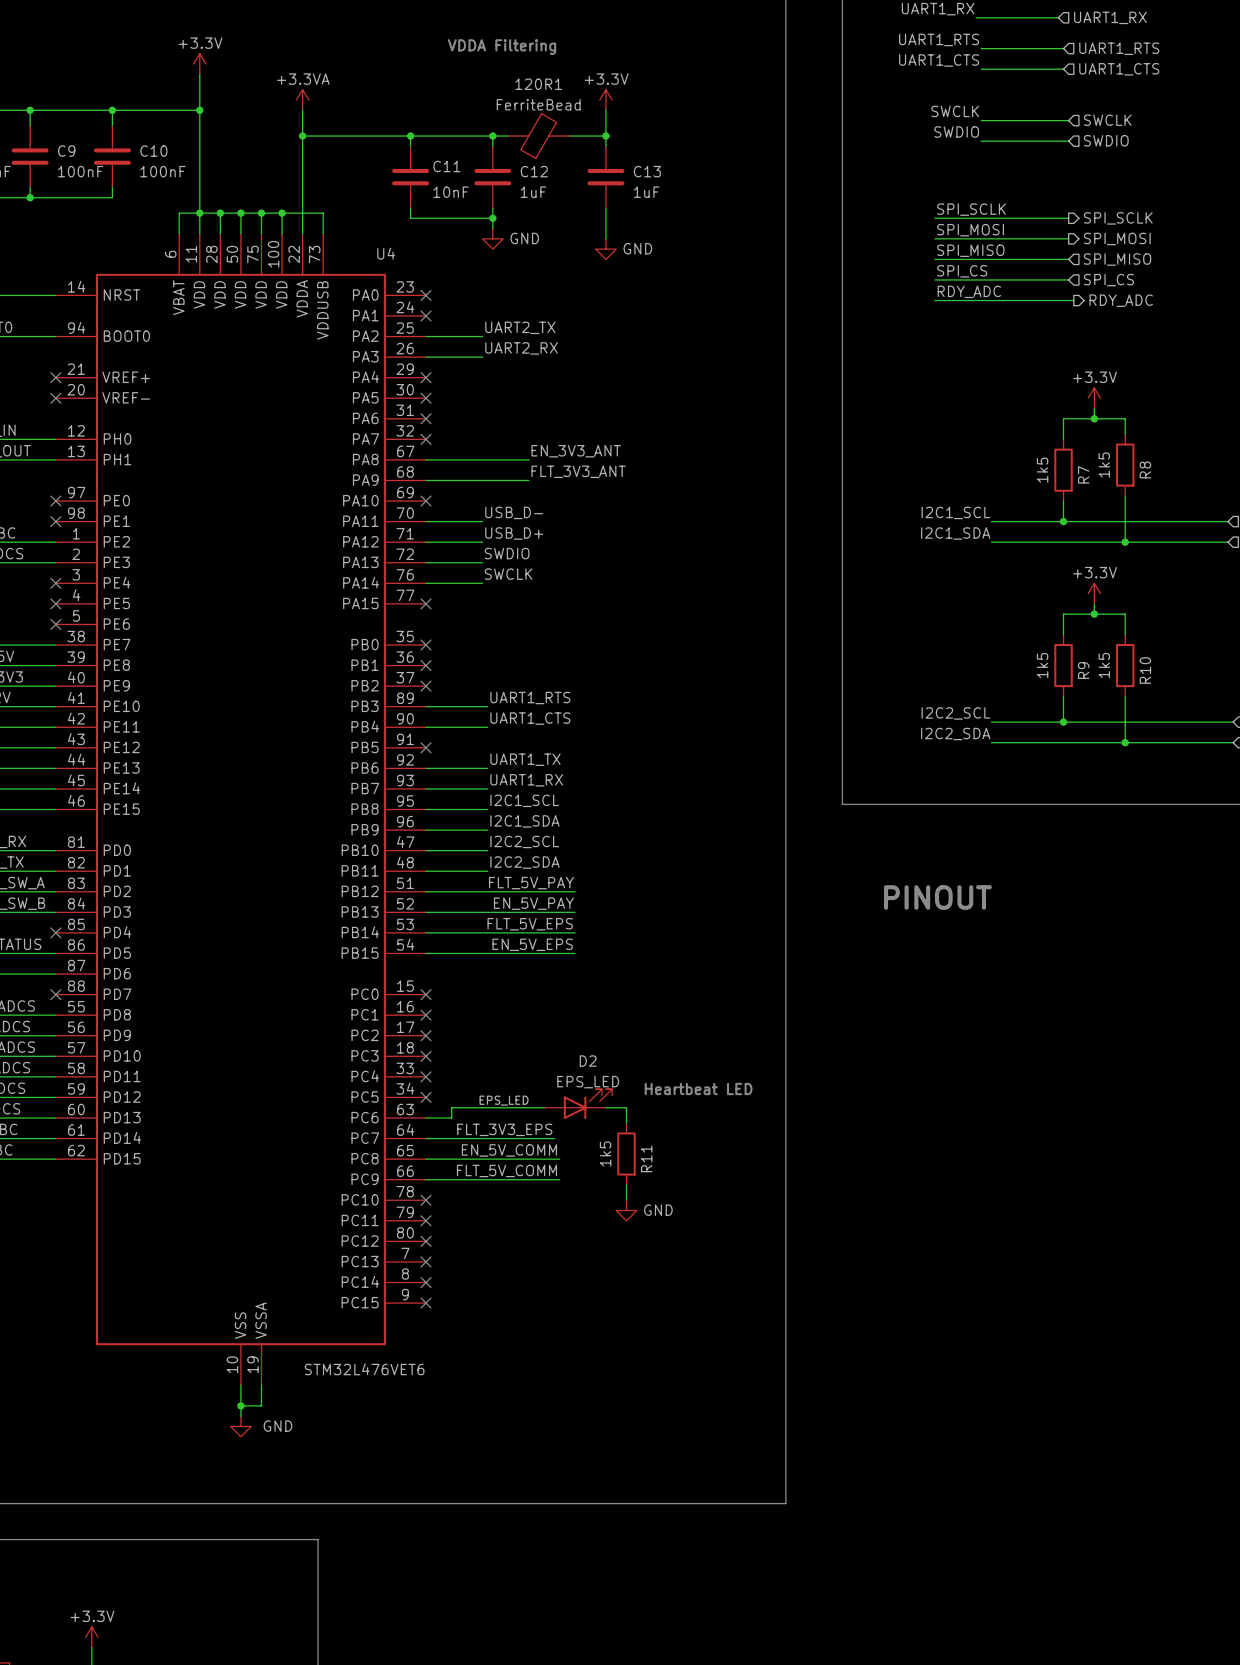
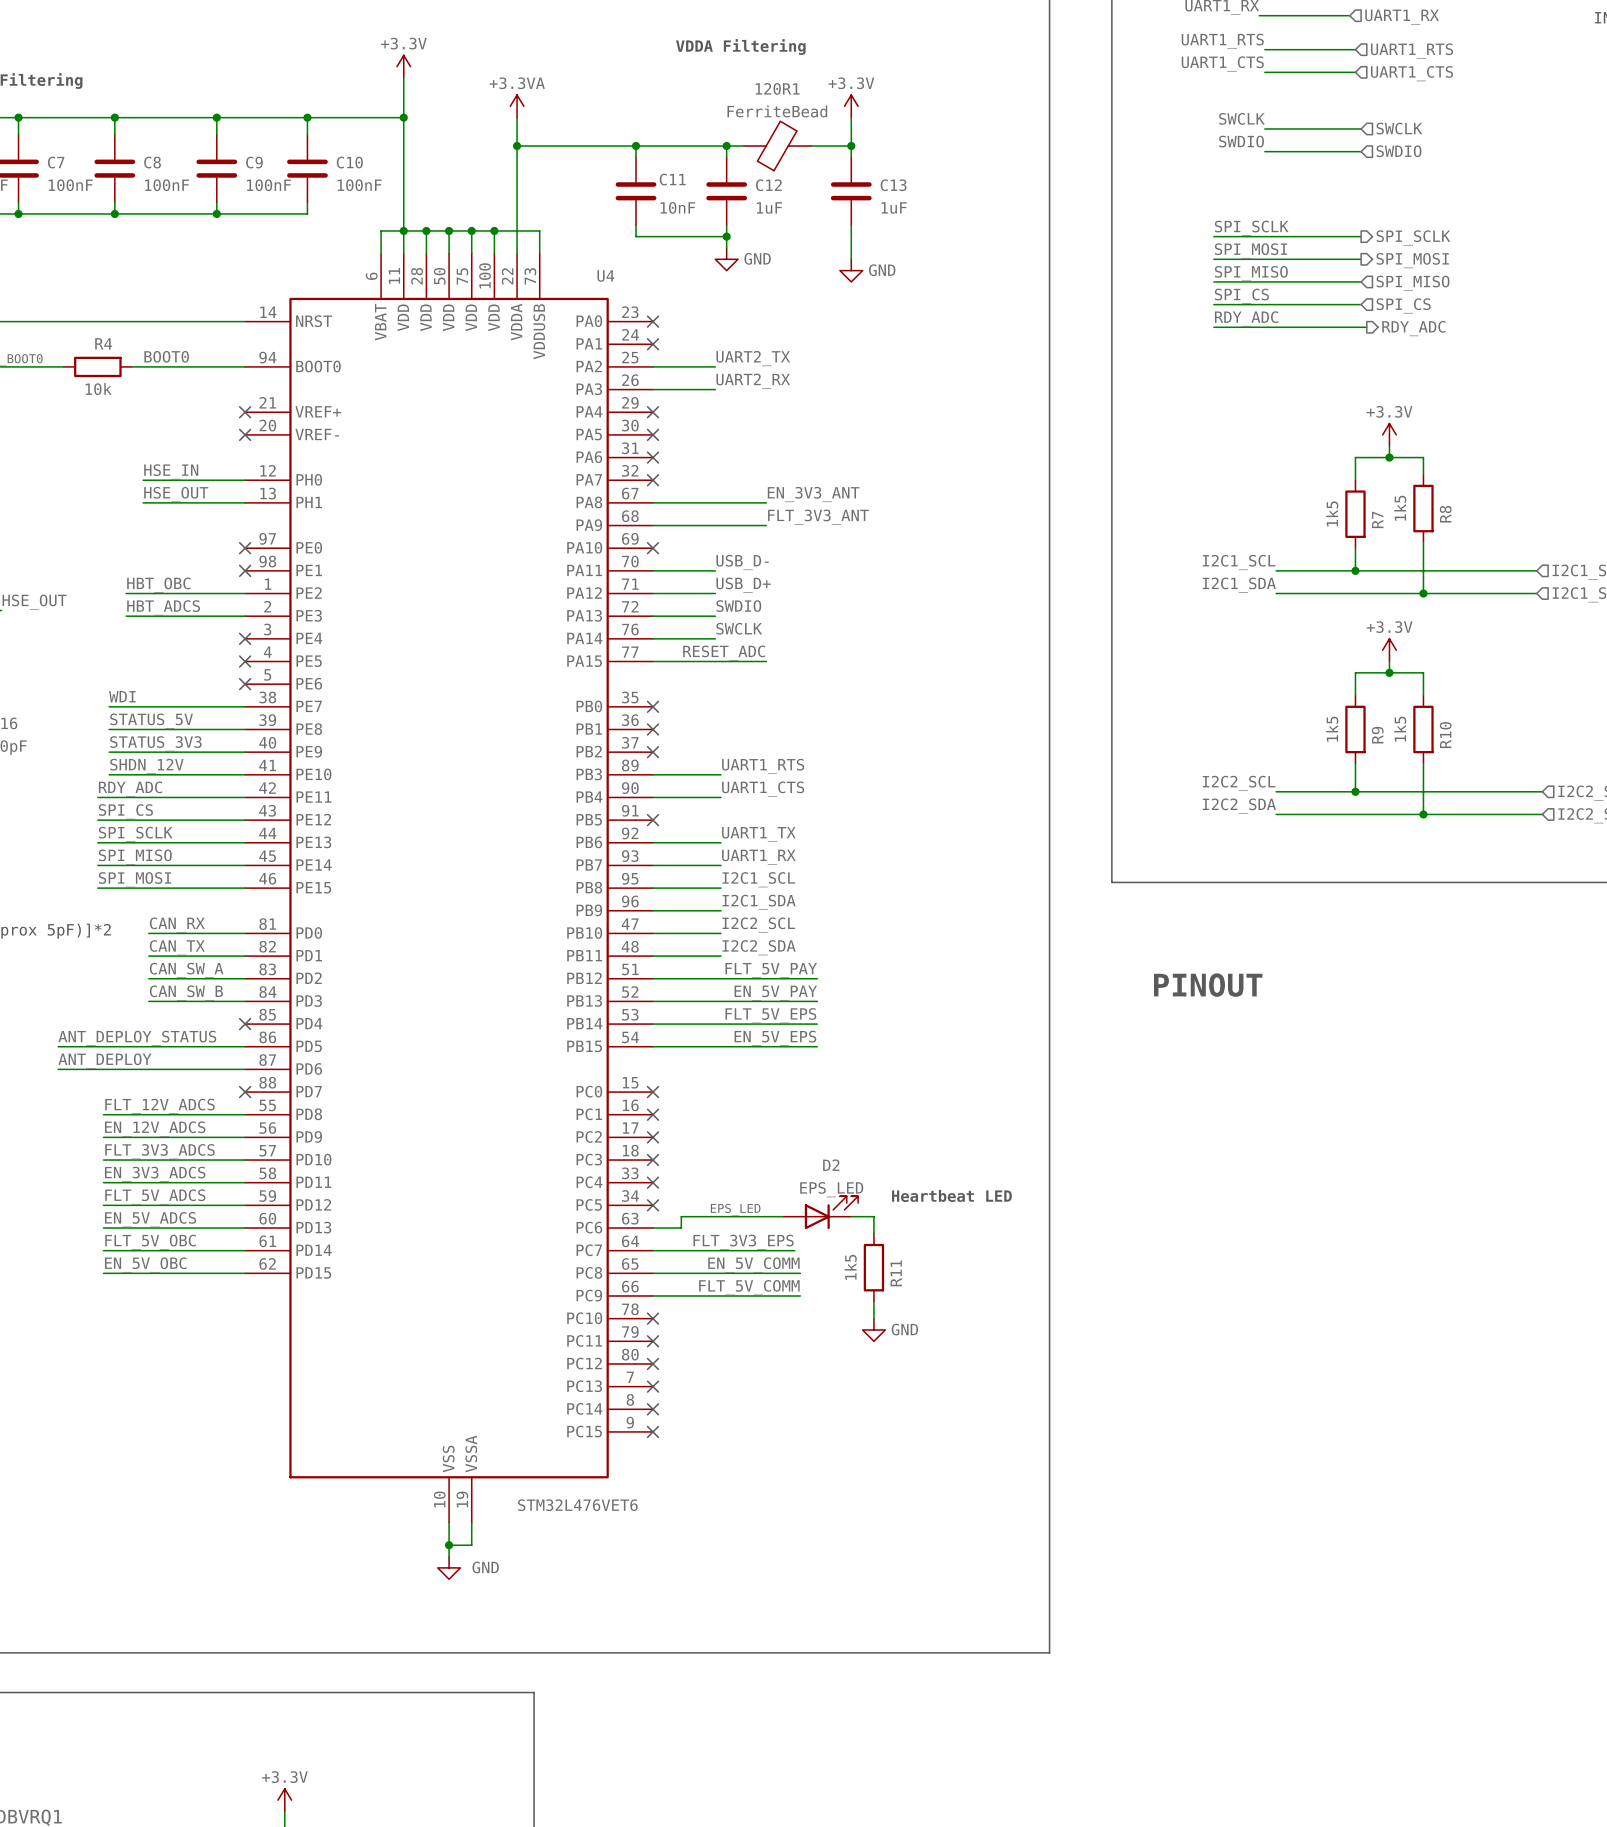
label: none -> RESET_ADC (724, 653)
wire: none -> (653, 661) (766, 661)
no-connect mark: (426, 603) -> none

